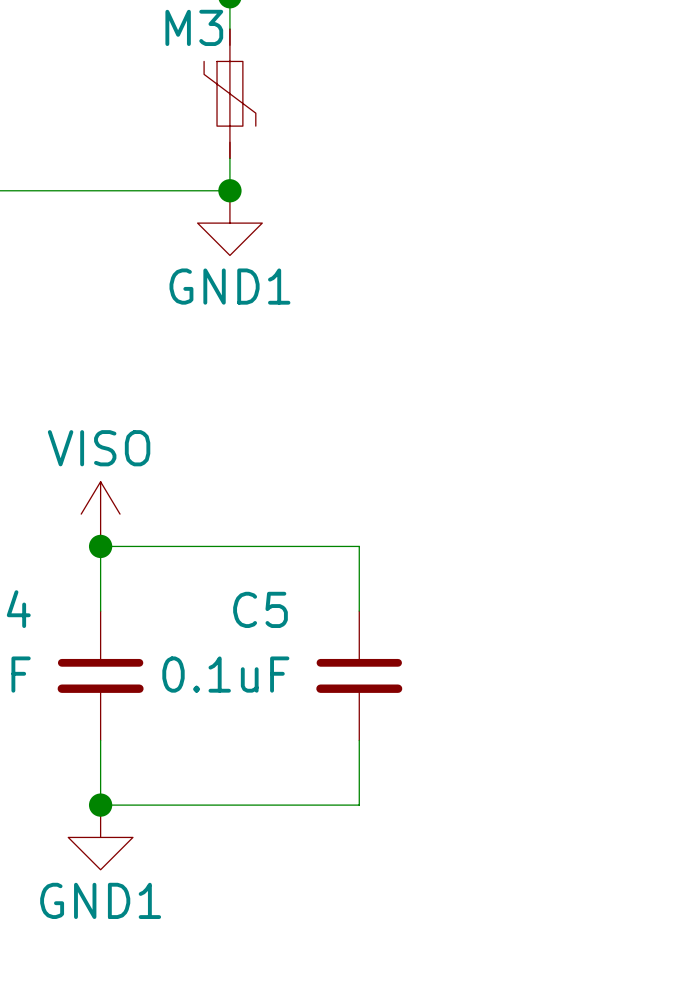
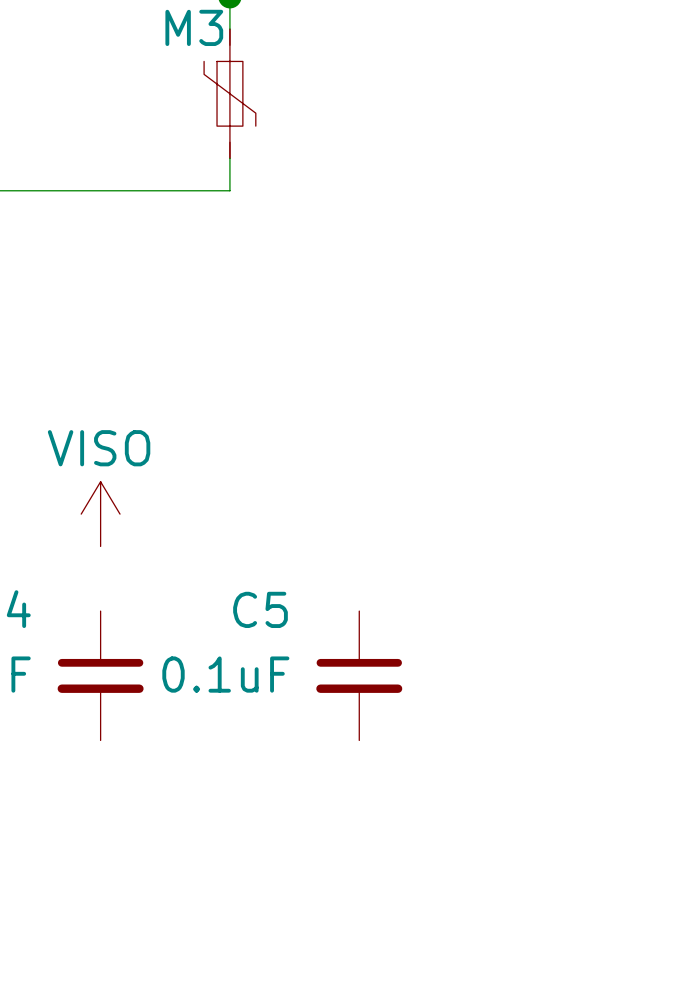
junction: (229, 190) -> none
power symbol: GND1 (229, 223) -> none
junction: (100, 546) -> none
wire: (100, 611) (100, 546) (359, 546) (359, 611) -> none
wire: (100, 740) (100, 805) (359, 805) (359, 740) -> none
junction: (100, 805) -> none
power symbol: GND1 (100, 837) -> none

